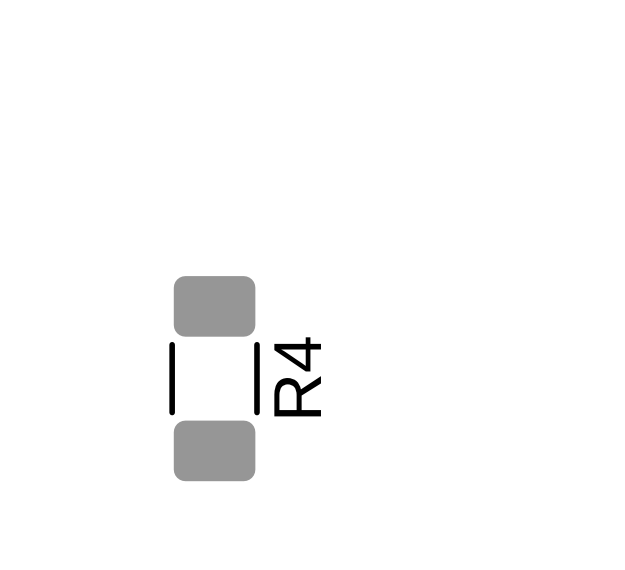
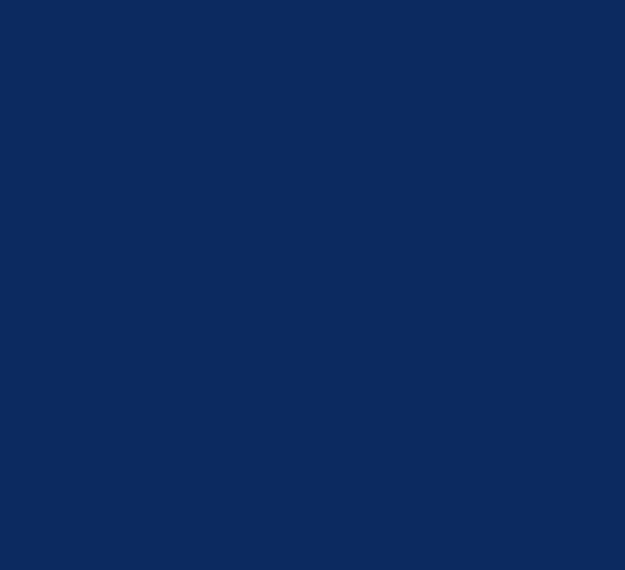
R4: (214, 378) -> none

